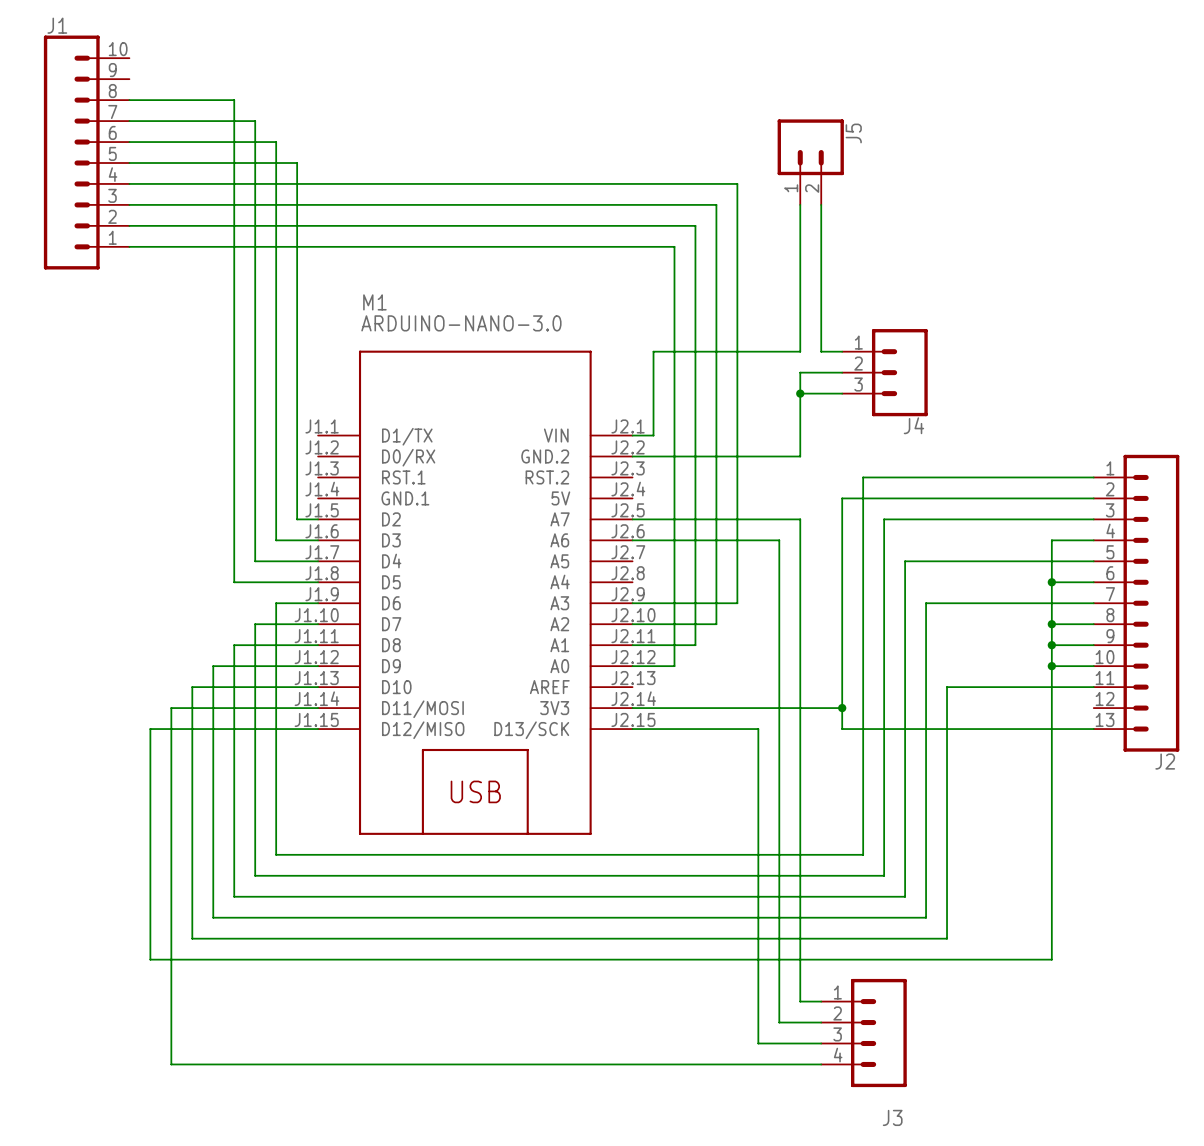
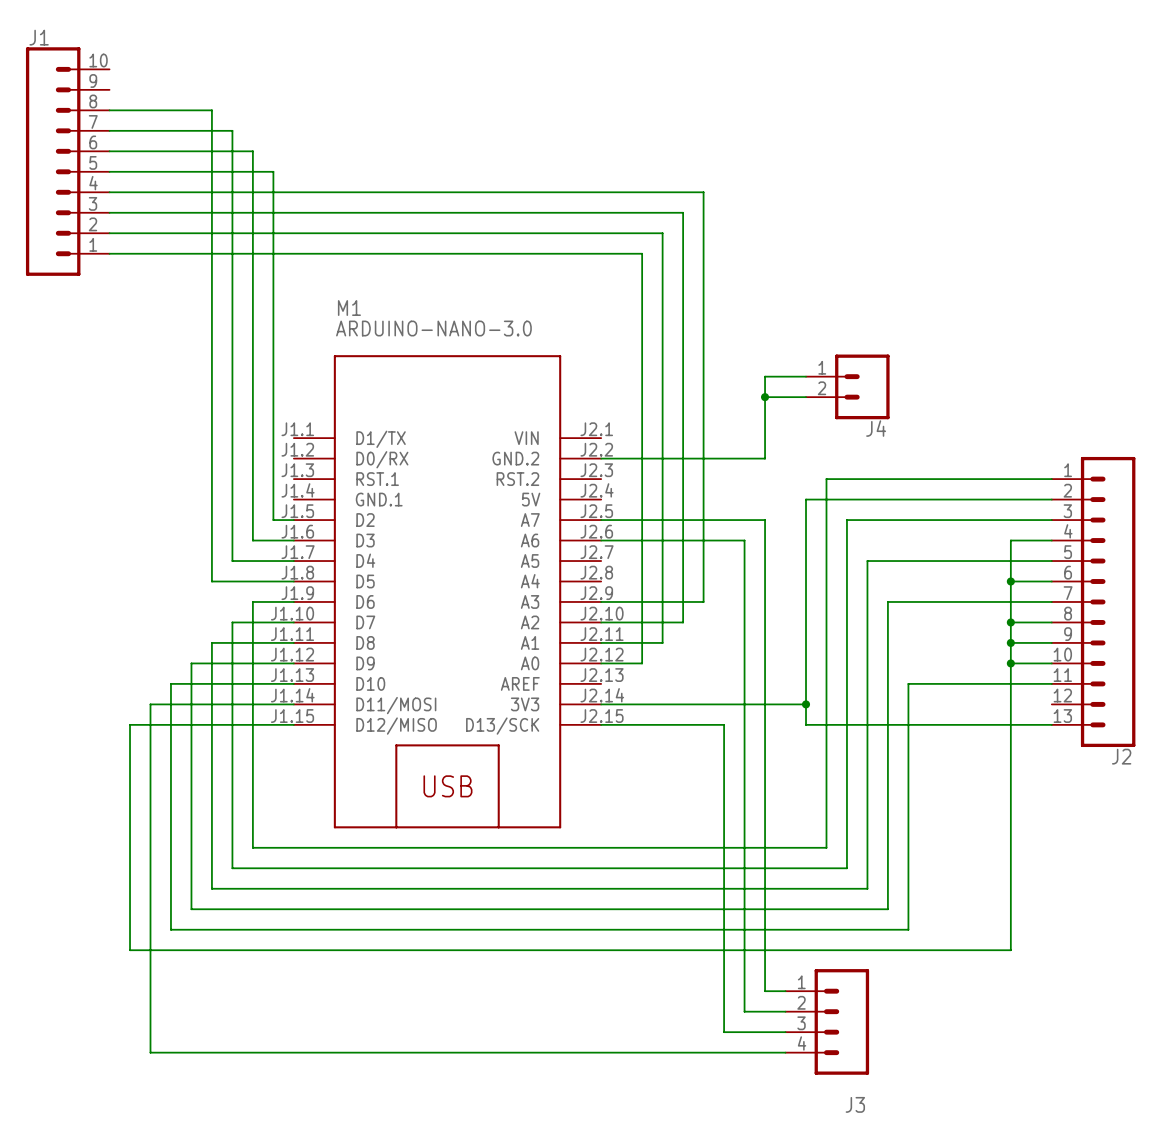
J5: (810, 162) -> none
wire: (800, 204) (800, 351) (653, 351) (653, 435) (632, 435) -> none
wire: (821, 204) (821, 351) (842, 351) -> none
J4 symbol: [842, 329, 928, 417] -> [806, 354, 890, 420]

